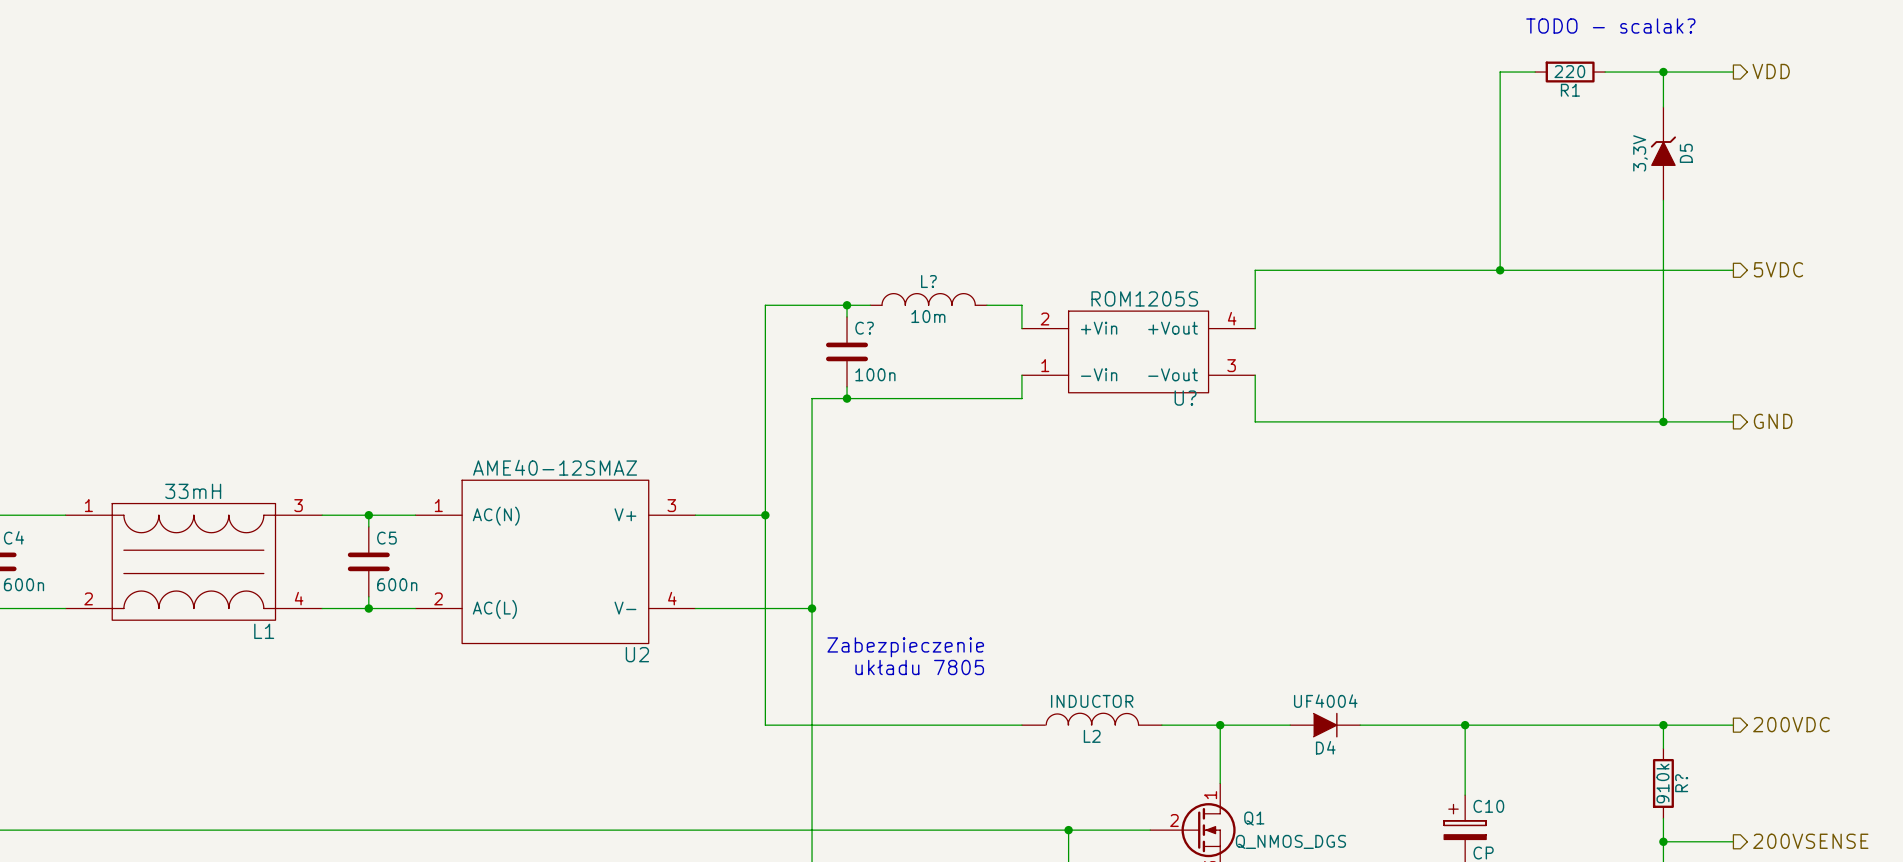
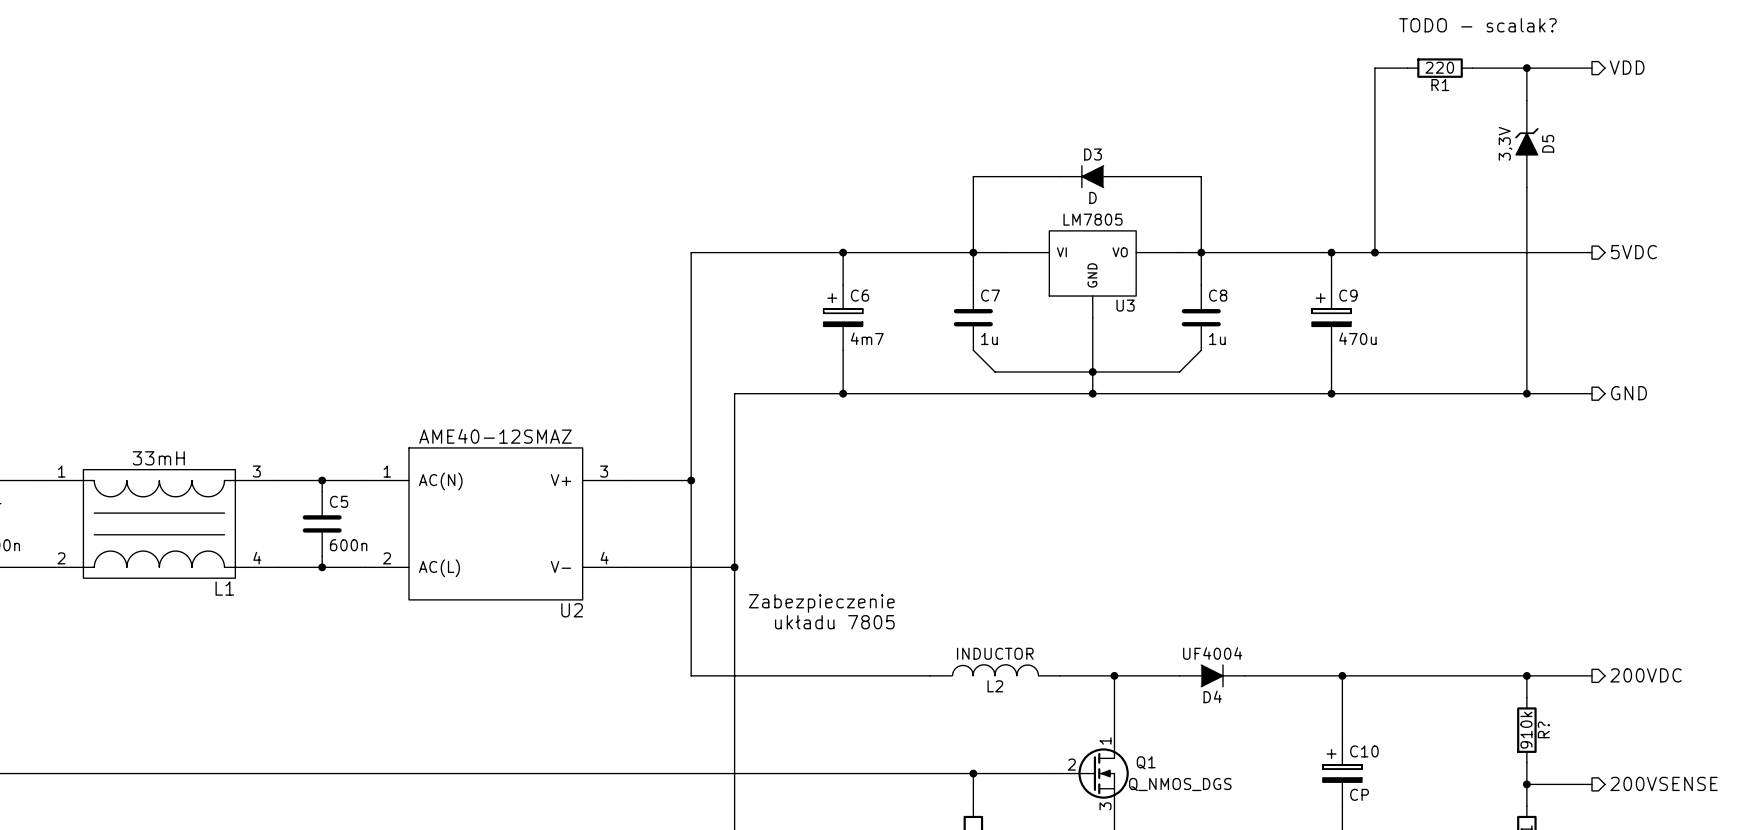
wire: none -> (1060, 176) (973, 176) (973, 285)
D3: none -> D (1092, 176)
wire: none -> (1125, 176) (1201, 176) (1201, 285)
wire: none -> (843, 252) (843, 285)
junction: none -> (843, 252)
junction: none -> (973, 252)
wire: (1290, 270) (1255, 270) (1255, 328) -> none
junction: none -> (1201, 252)
wire: none -> (1331, 252) (1331, 285)
junction: none -> (1331, 252)
U3: none -> LM7805 (1092, 274)
L?: 10m (928, 299) -> none
wire: (765, 305) (870, 305) -> (691, 285) (691, 252) (1005, 252)
wire: (847, 305) (847, 316) -> none
junction: (847, 305) -> none
wire: (986, 305) (1021, 305) (1021, 328) -> none
C6: none -> 4m7 (843, 317)
C7: none -> 1u (973, 317)
wire: none -> (1092, 317) (1092, 393)
C8: none -> 1u (1201, 317)
C9: none -> 470u (1331, 317)
C?: 100n (847, 351) -> none
U?: ROM1205S (1138, 351) -> none
wire: none -> (843, 350) (843, 393)
wire: (1021, 375) (1021, 398) (812, 398) (812, 421) -> (1147, 393) (734, 393)
wire: none -> (973, 350) (995, 371) (1179, 371) (1201, 350)
wire: (1255, 375) (1255, 421) -> (1331, 350) (1331, 393)
wire: (847, 386) (847, 398) -> none
junction: (847, 398) -> none
junction: none -> (1092, 371)
junction: none -> (843, 393)
junction: none -> (1092, 393)
junction: none -> (1331, 393)

